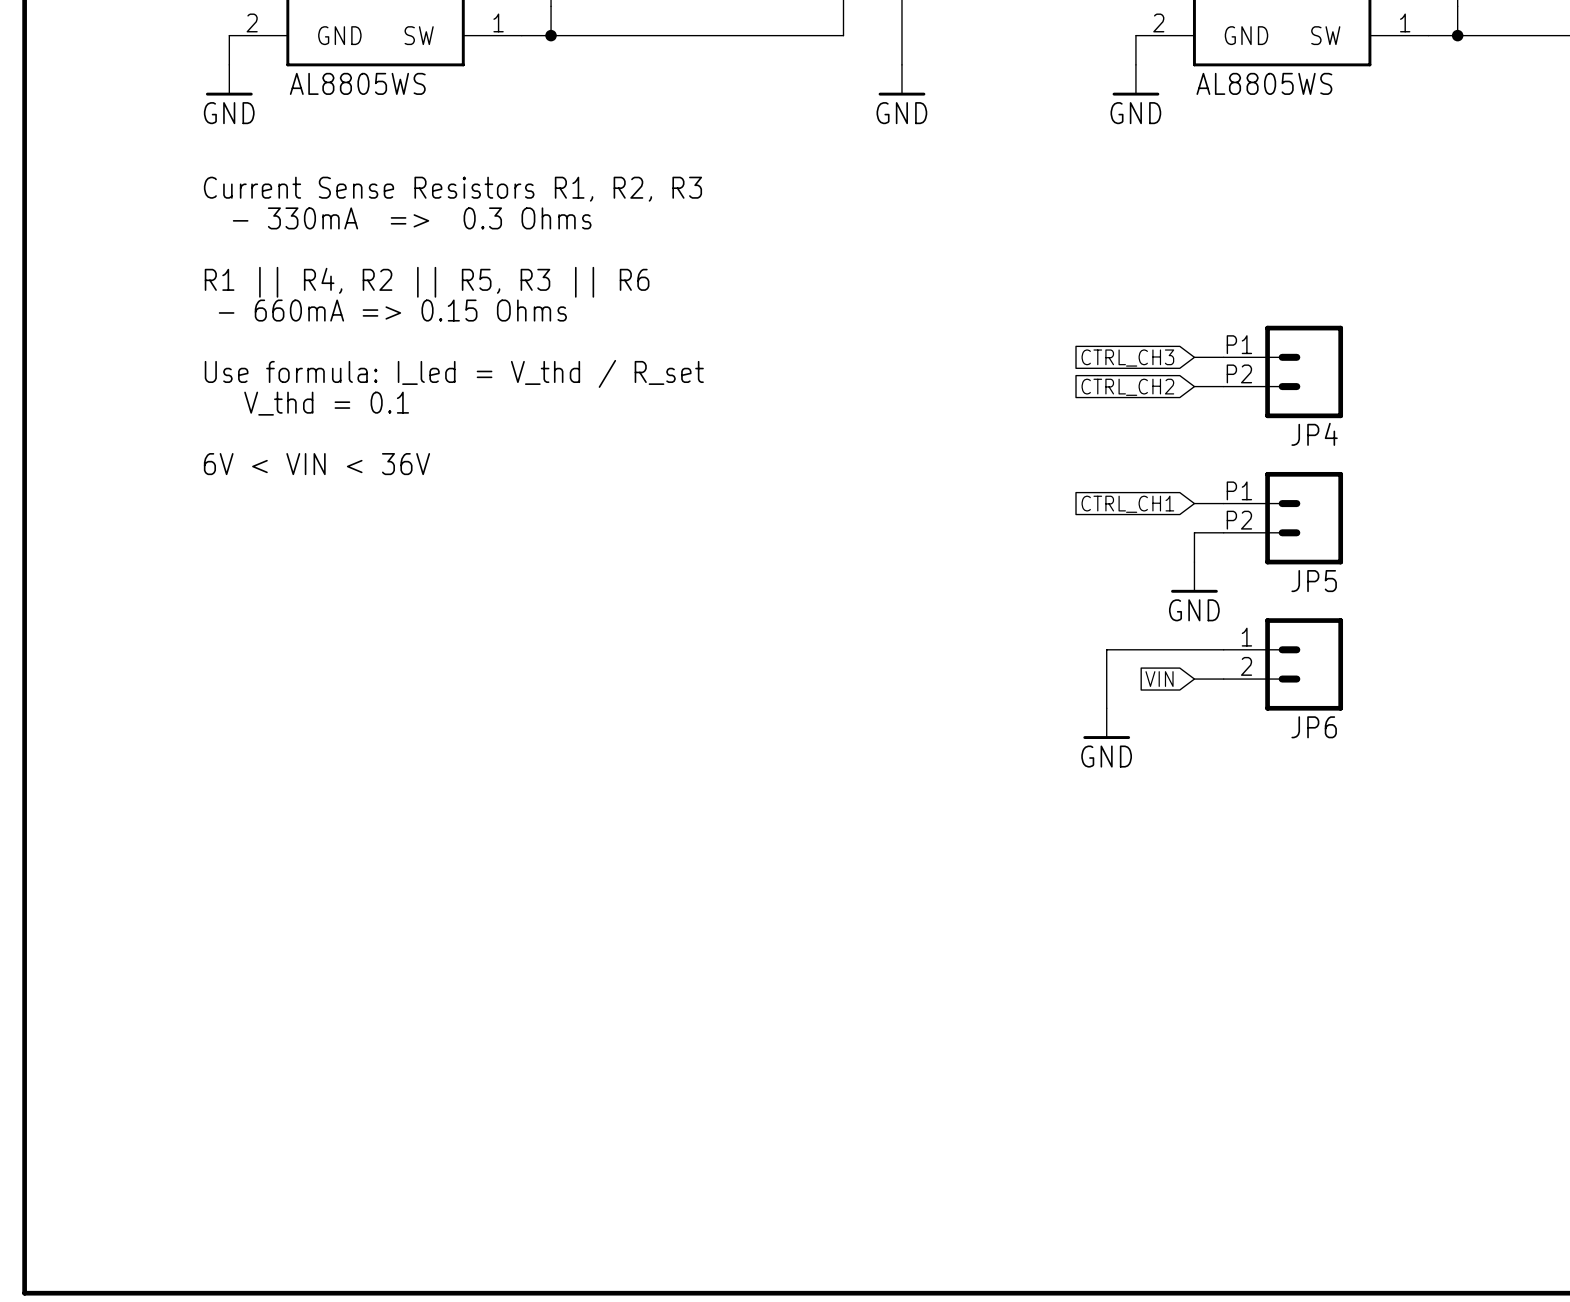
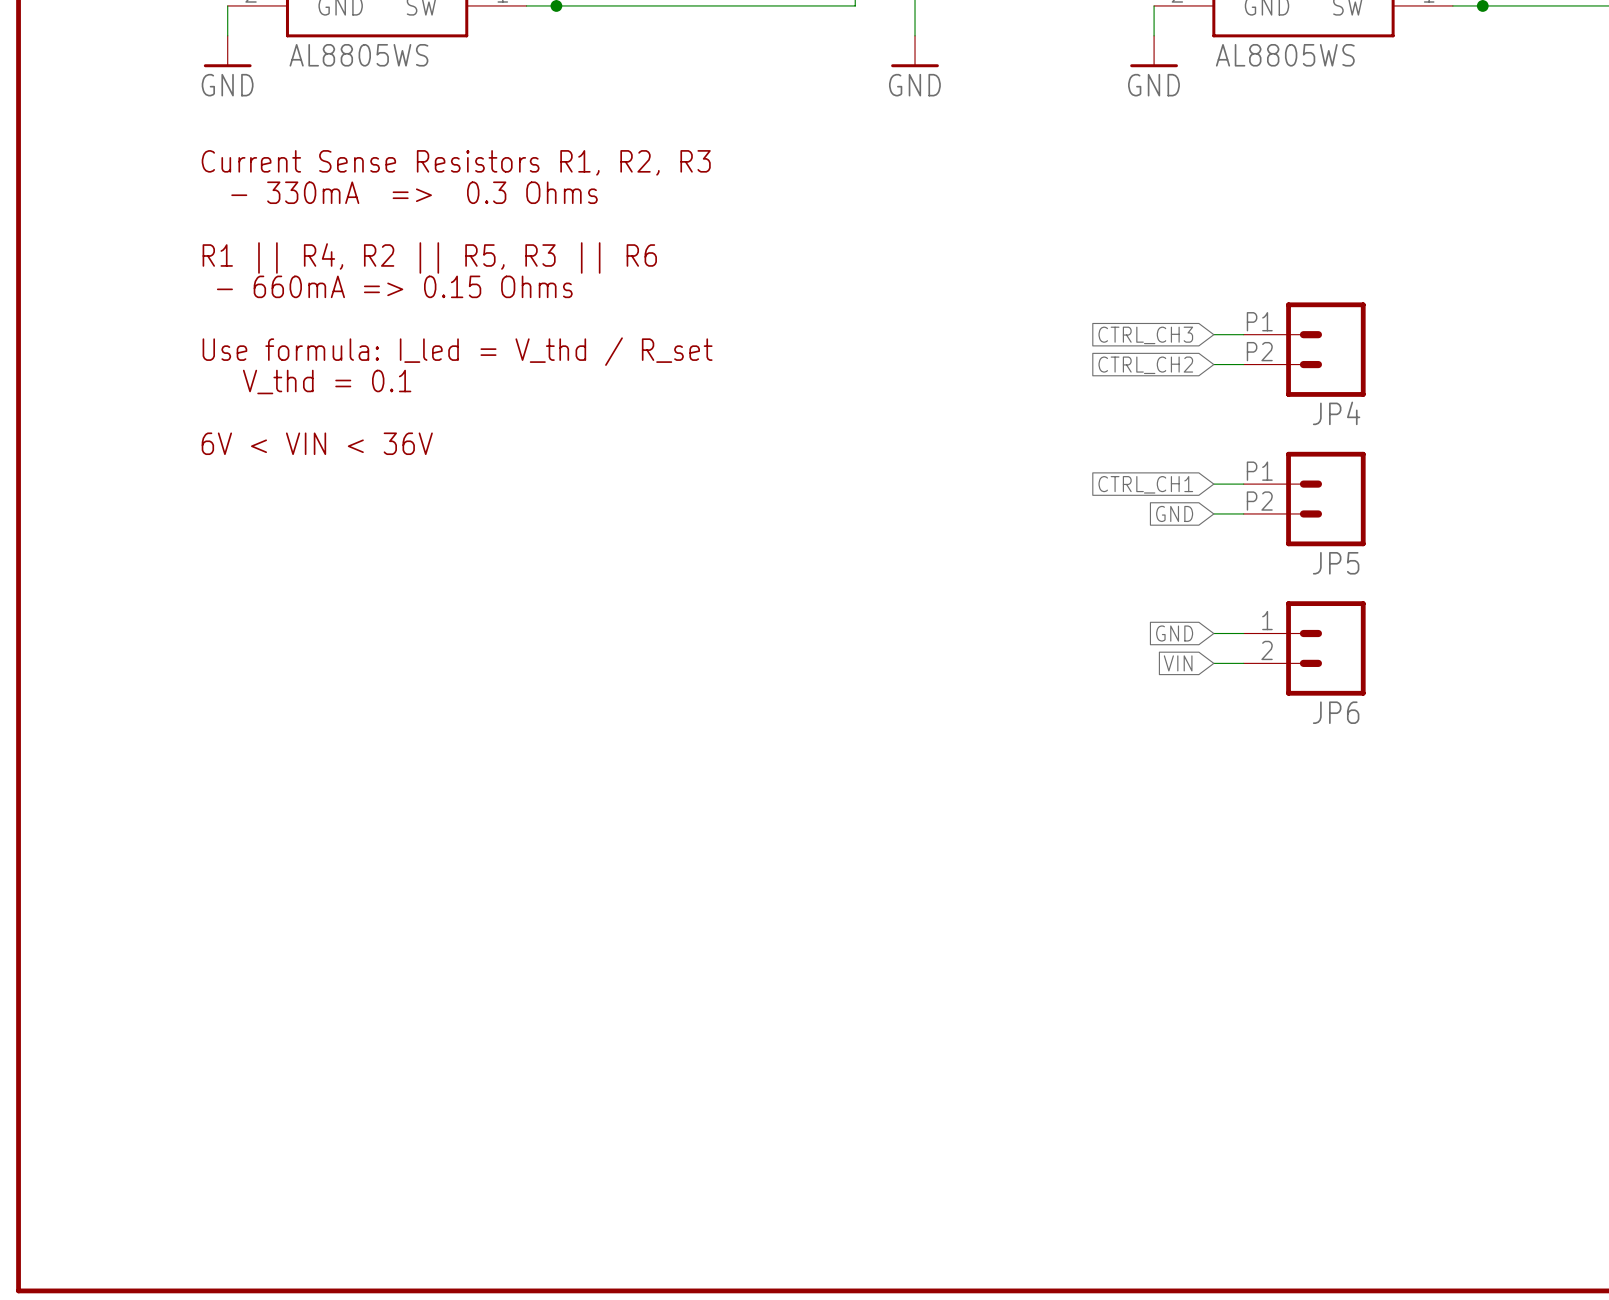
global label: none -> GND (1174, 513)
wire: (1194, 532) (1194, 562) -> none
power symbol: GND (1194, 577) -> none
global label: none -> GND (1174, 633)
wire: (1194, 649) (1106, 649) (1106, 708) -> none
power symbol: GND (1106, 723) -> none

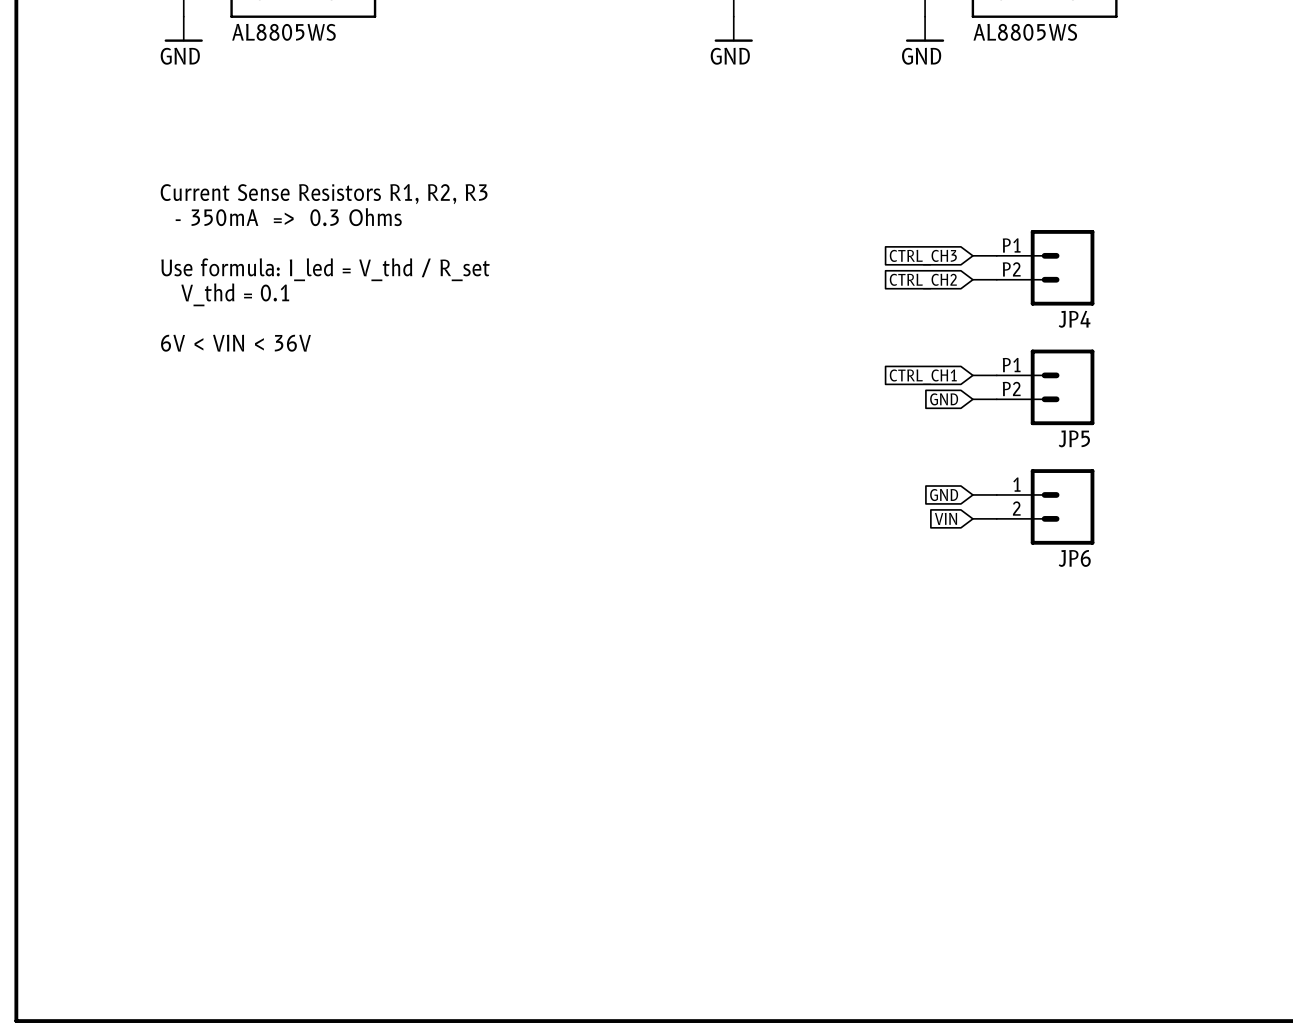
text: Current Sense Resistors R1, R2, R3 (456, 162) -> none
text: - 330mA => 0.3 Ohms (414, 192) -> none
text: R1 || R4, R2 || R5, R3 || R6 (429, 257) -> Current Sense Resistors R1, R2, R3 (324, 194)
text: - 660mA => 0.15 Ohms (394, 286) -> - 350mA => 0.3 Ohms (288, 217)

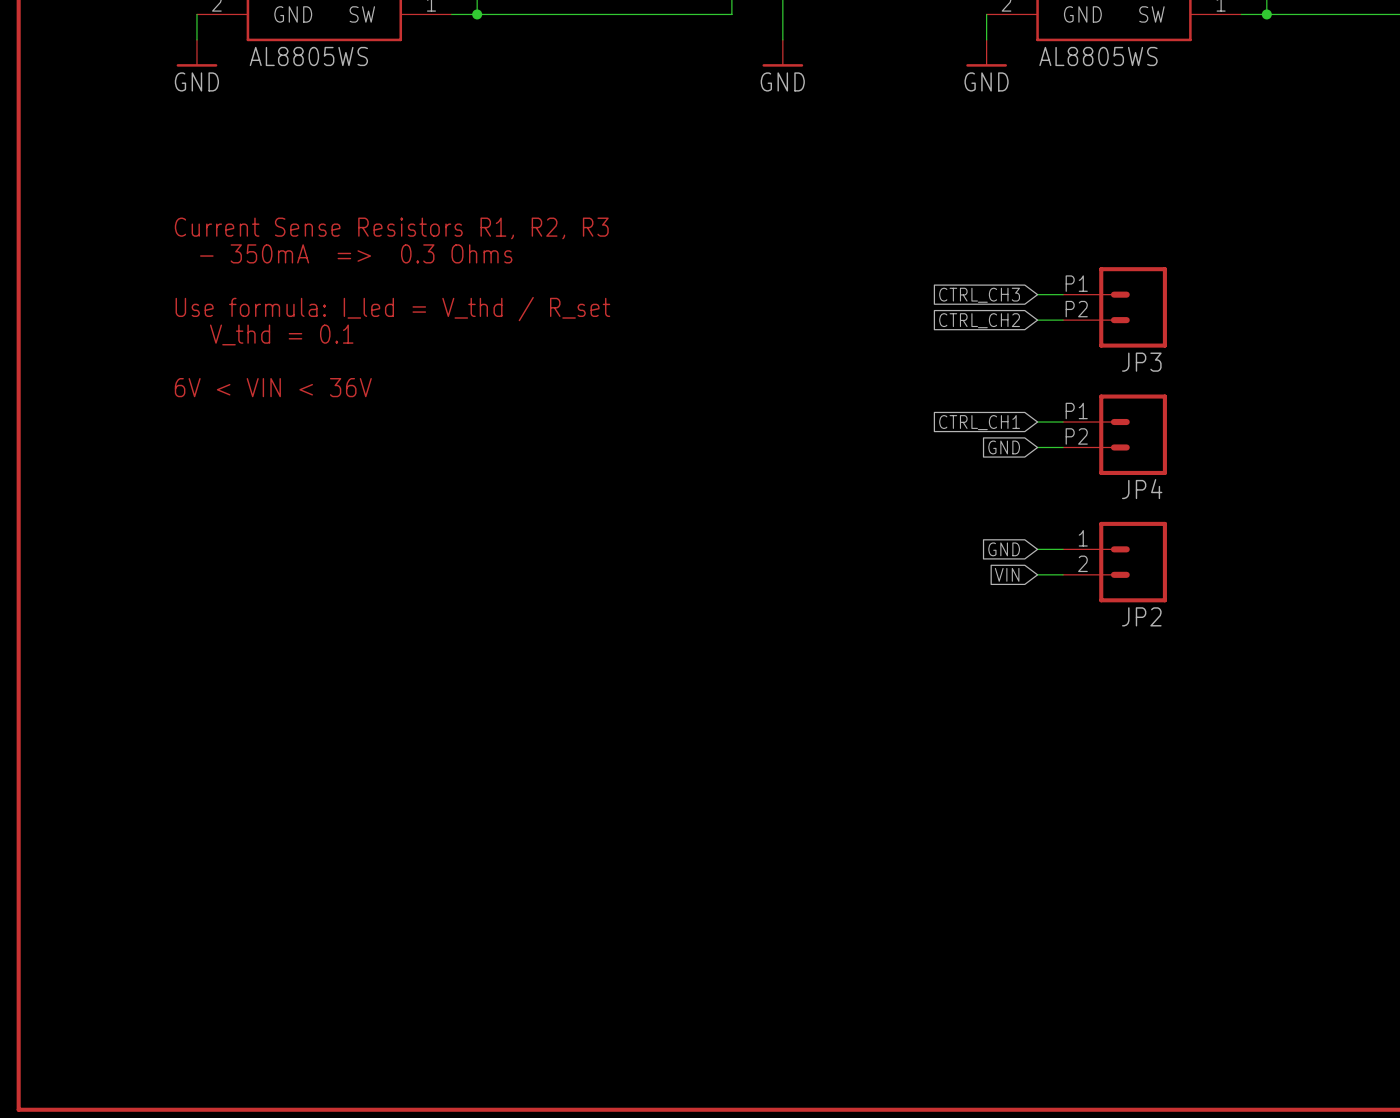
JP4 name: JP4 (1074, 319) -> JP3 (1141, 362)
JP5 name: JP5 (1074, 438) -> JP4 (1142, 489)
JP6 name: JP6 (1074, 558) -> JP2 (1141, 616)

